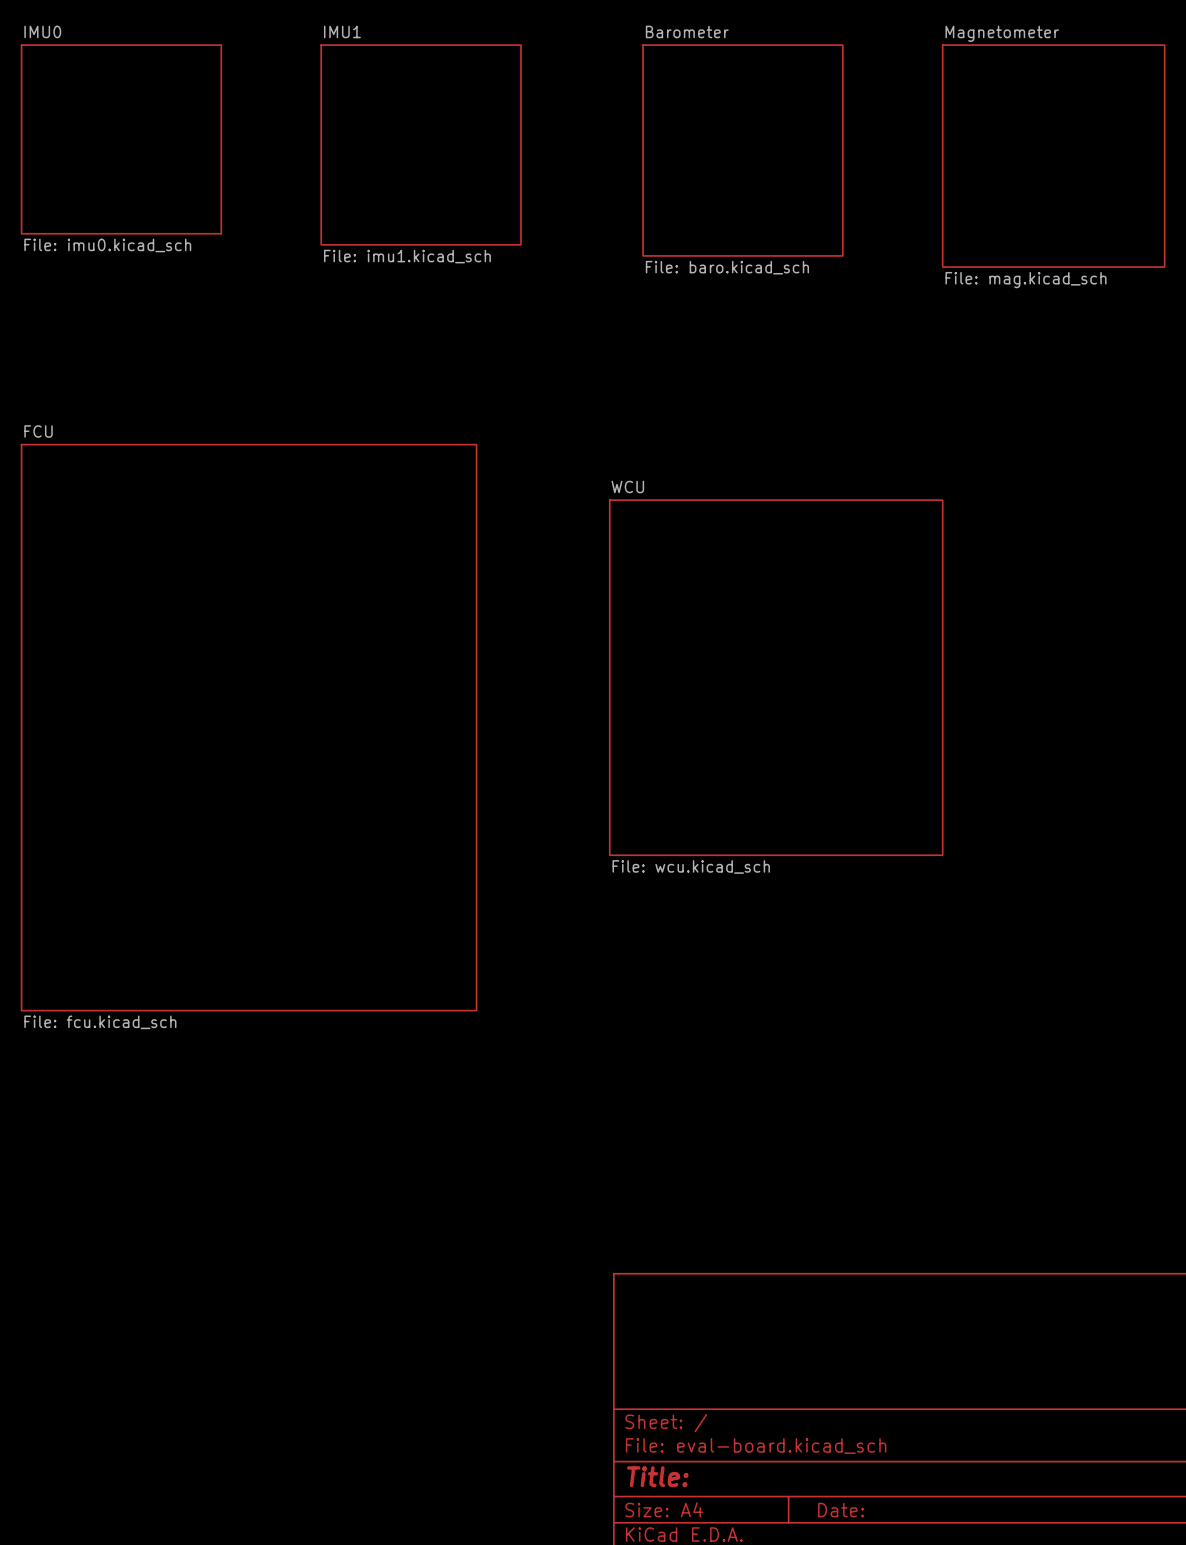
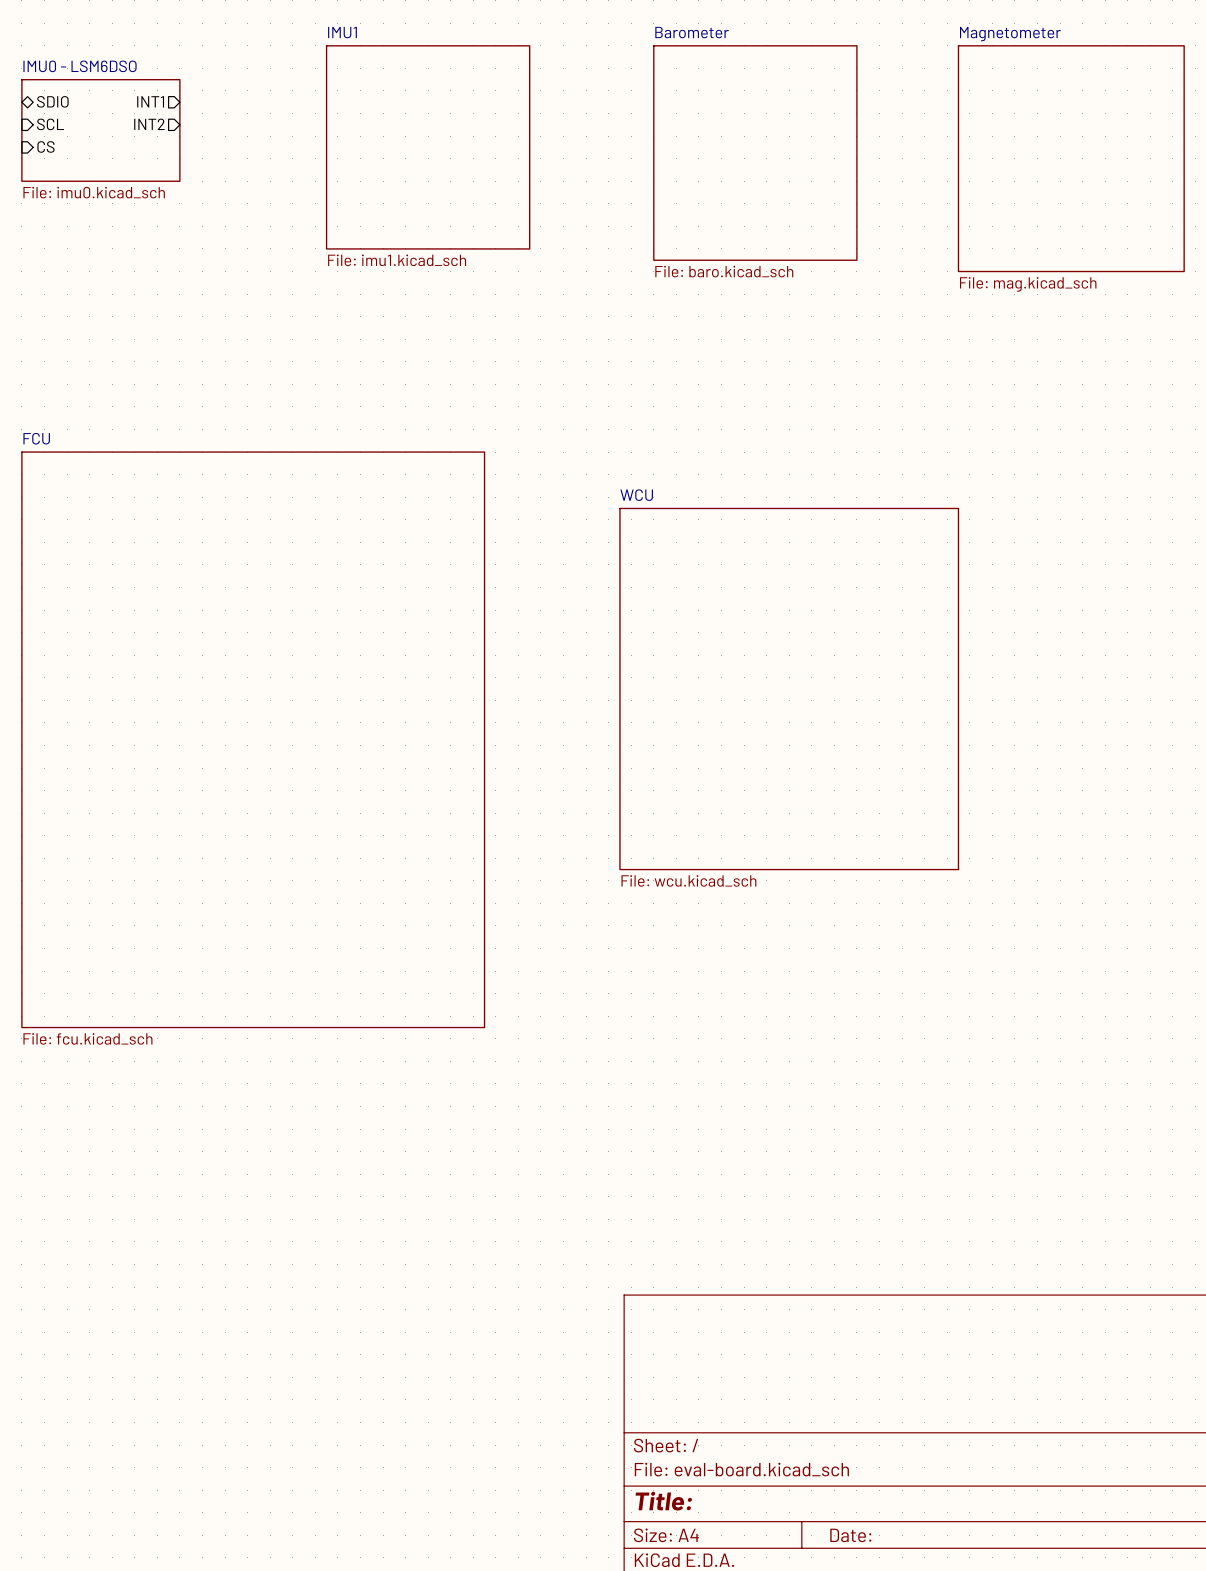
sheet pin: none -> SDIO (52, 101)
sheet pin: none -> INT1 (150, 101)
sheet pin: none -> SCL (50, 124)
sheet pin: none -> INT2 (149, 124)
sheet IMU0 - LSM6DSO: none -> File: imu0.kicad_sch (100, 130)
sheet IMU0: File: imu0.kicad_sch (121, 139) -> none
sheet pin: none -> CS (45, 146)

